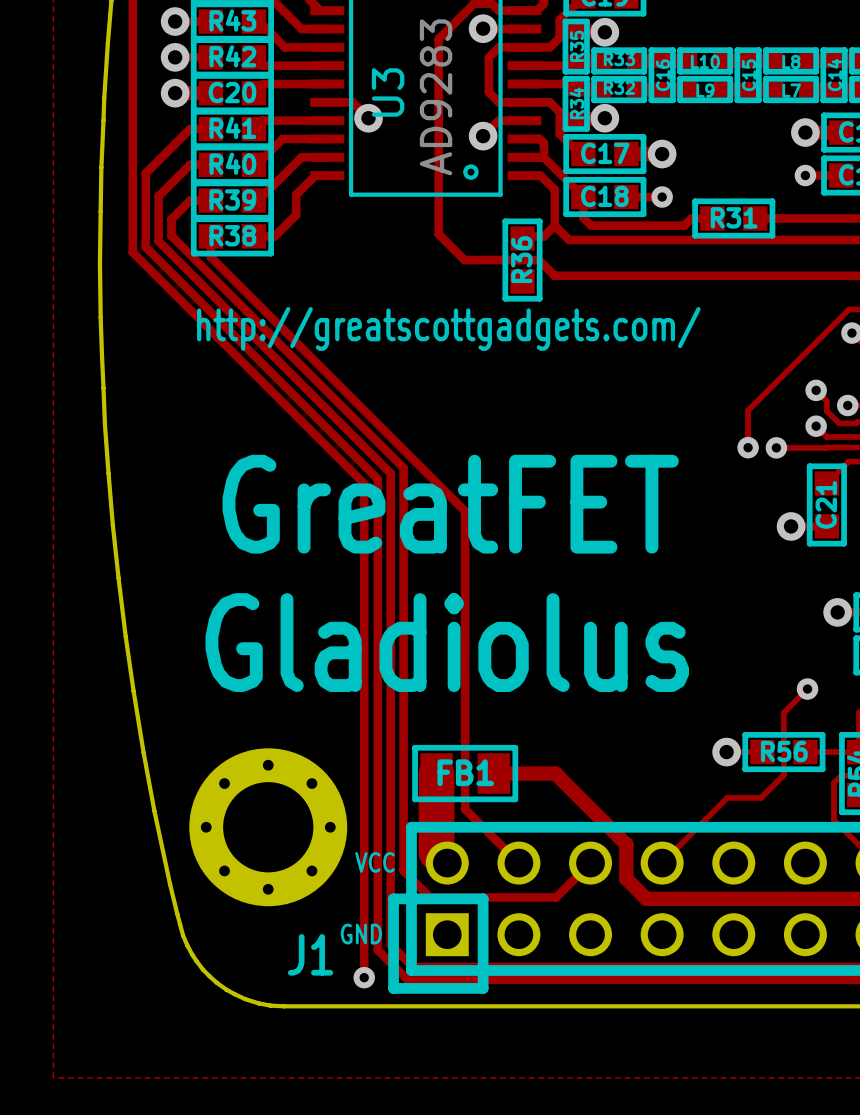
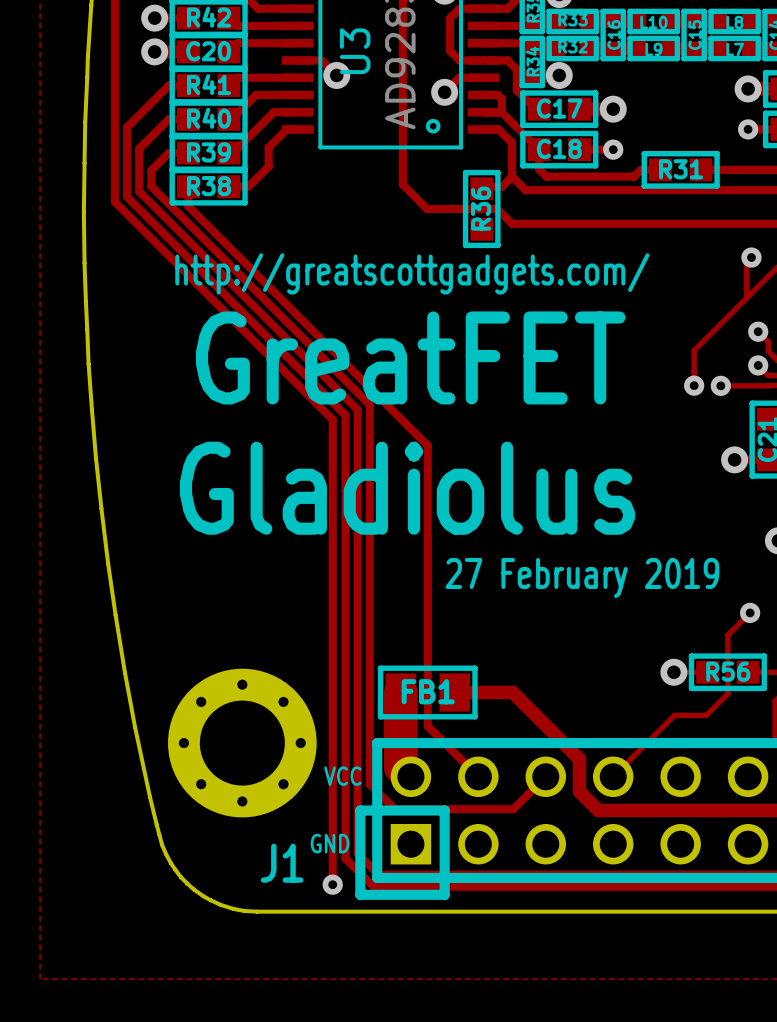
track: none -> (751, 257) (746, 262) (746, 298)
via: none -> (751, 257)
text position: GreatFET (450, 504) -> GreatFET (410, 357)
text position: Gladiolus (447, 642) -> Gladiolus (407, 488)
text: none -> 27 February 2019 (582, 577)

